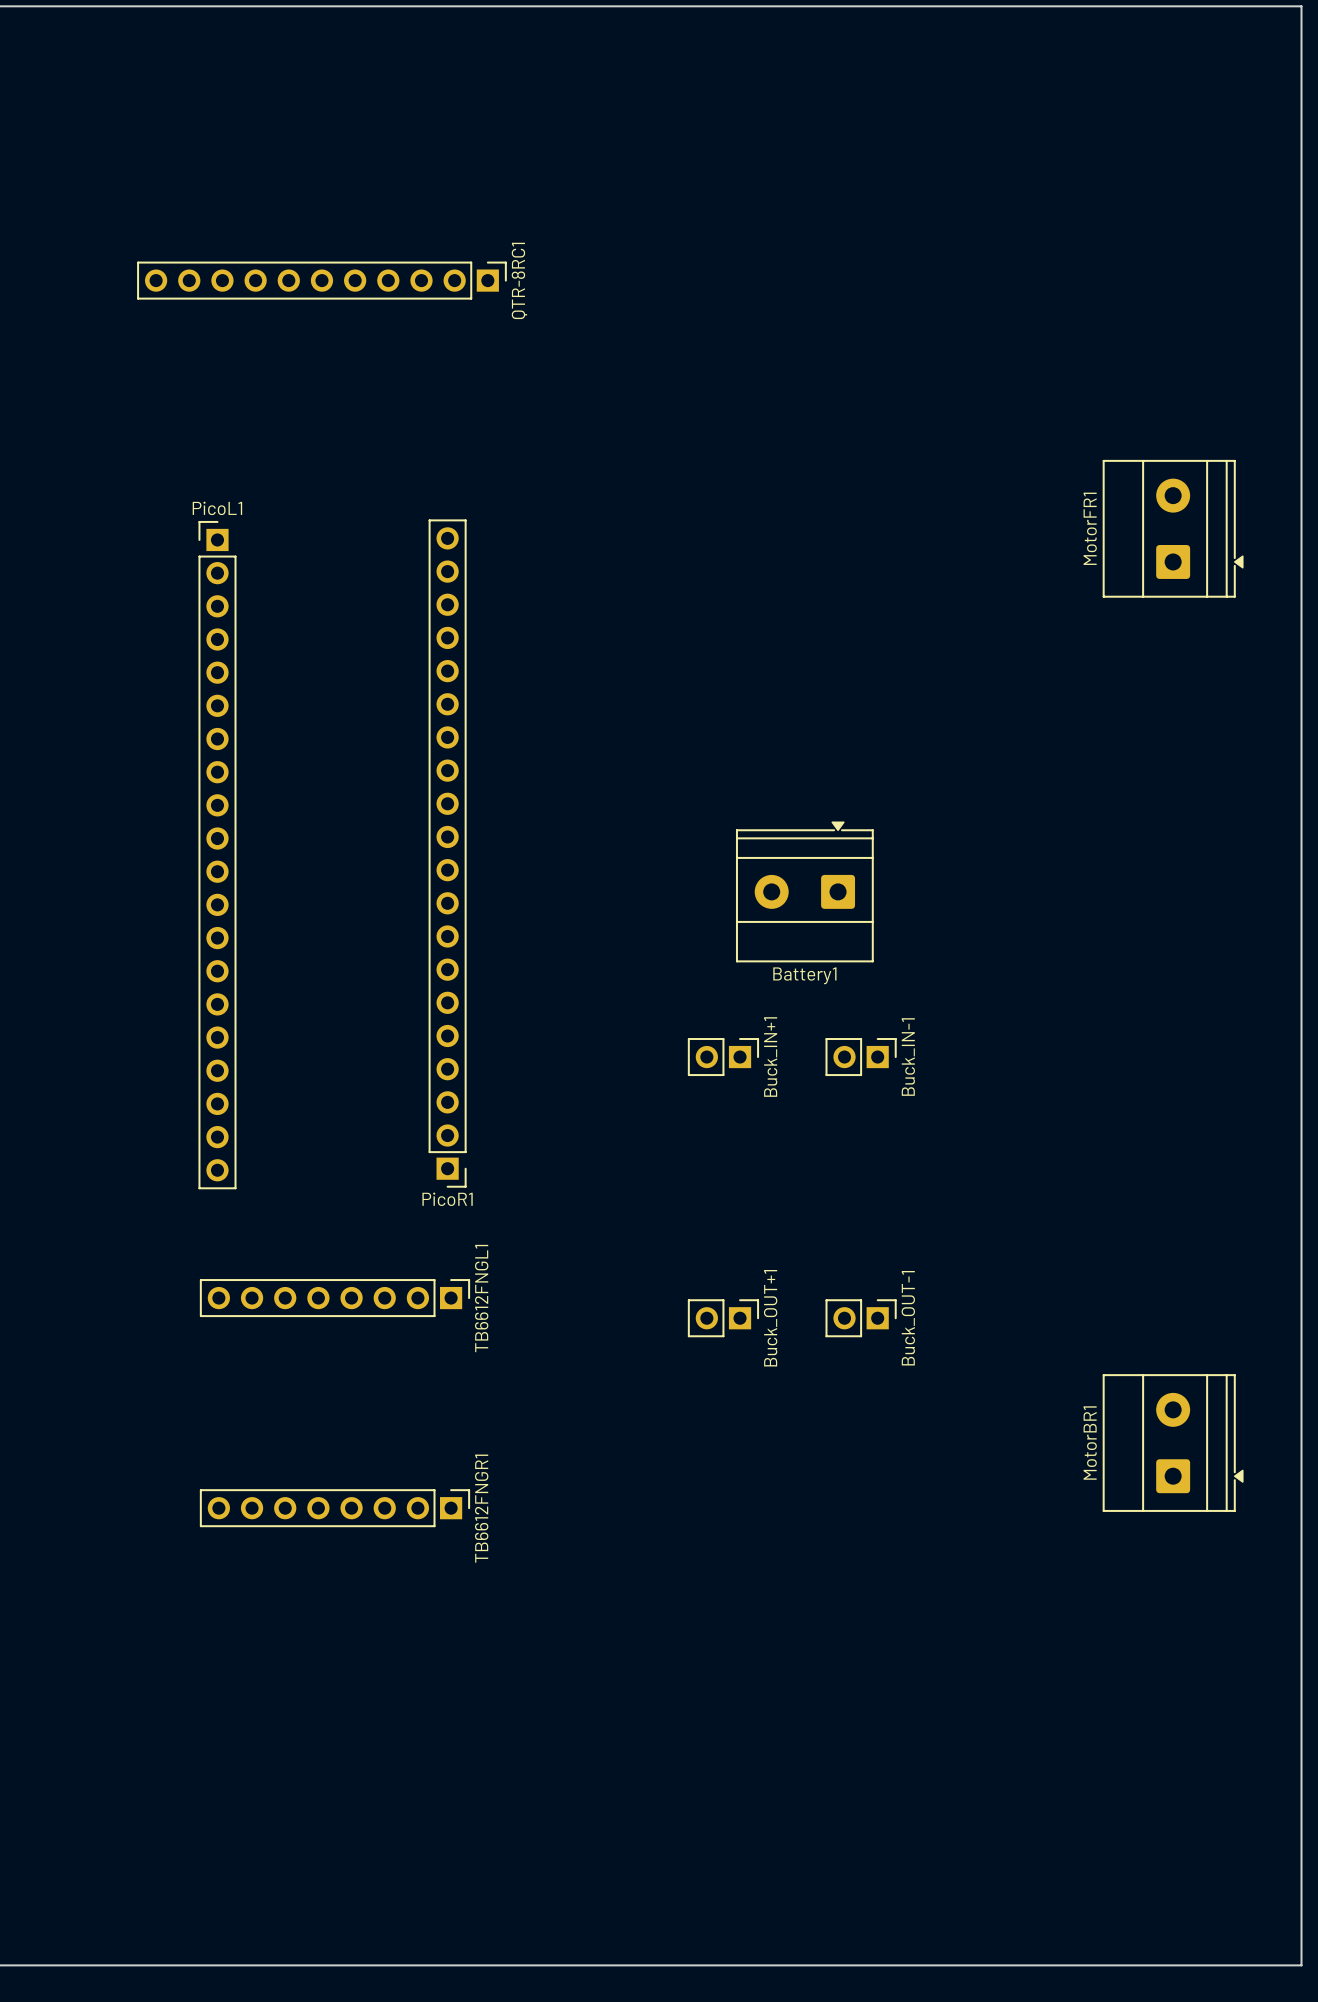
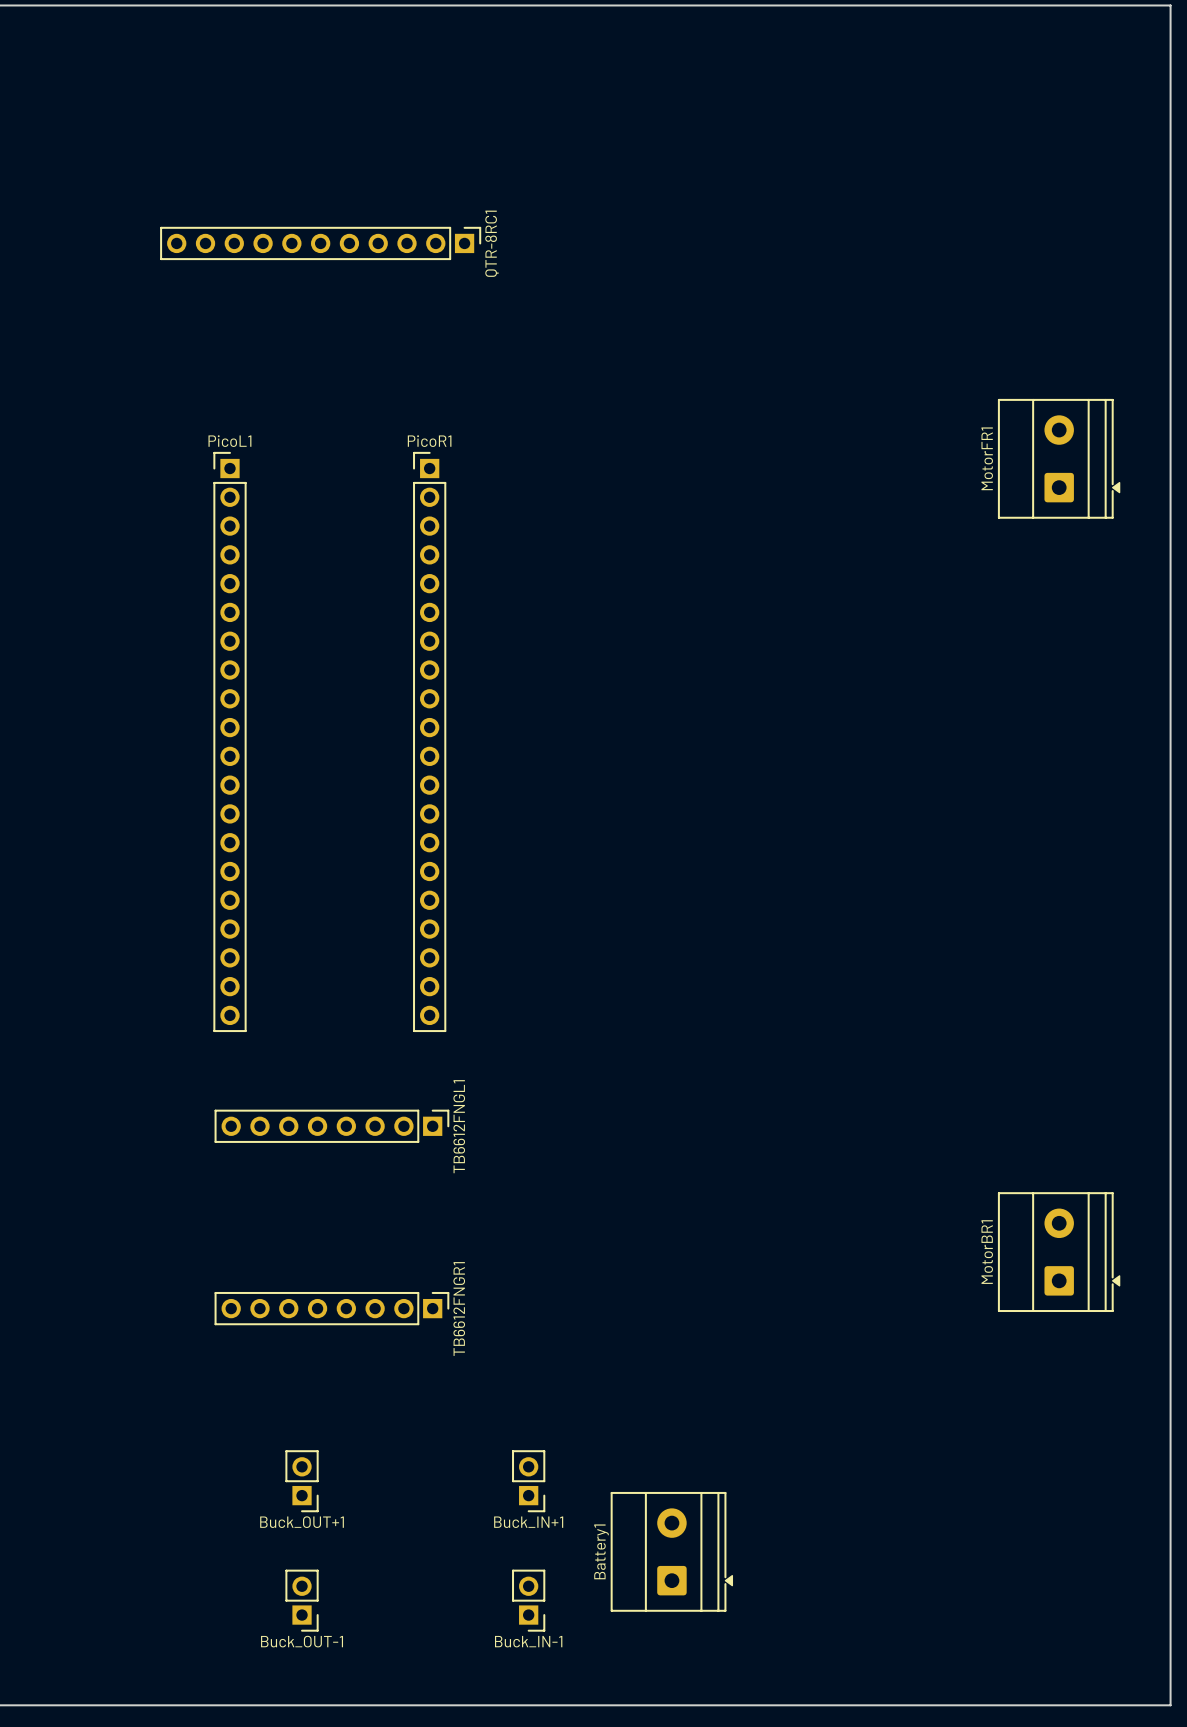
PicoR1 rotation: 0° (447, 853) -> 180° (429, 741)
Battery1 rotation: 0° (804, 891) -> 90° clockwise (672, 1551)
Battery1 position: (804, 891) -> (672, 1551)
Buck_IN+1 rotation: 0° (723, 1057) -> 90° clockwise (528, 1481)
Buck_IN+1 position: (723, 1057) -> (528, 1481)
Buck_IN-1 rotation: 0° (861, 1057) -> 90° clockwise (528, 1600)
Buck_IN-1 position: (861, 1057) -> (528, 1600)
Buck_OUT+1 rotation: 0° (723, 1318) -> 90° clockwise (302, 1481)
Buck_OUT+1 position: (723, 1318) -> (302, 1481)
Buck_OUT-1 rotation: 0° (861, 1318) -> 90° clockwise (302, 1600)
Buck_OUT-1 position: (861, 1318) -> (302, 1600)

